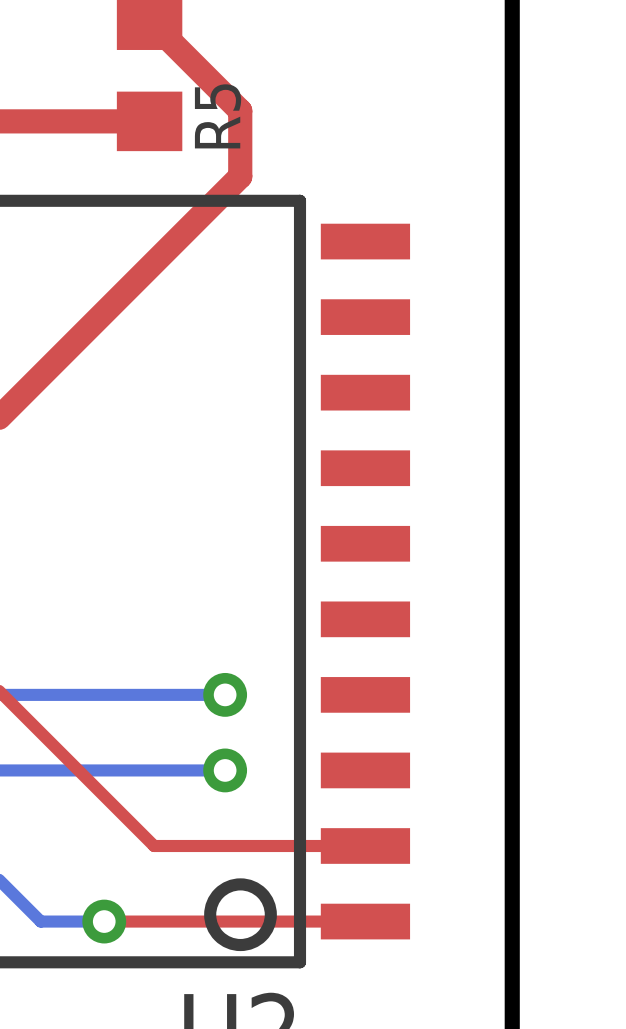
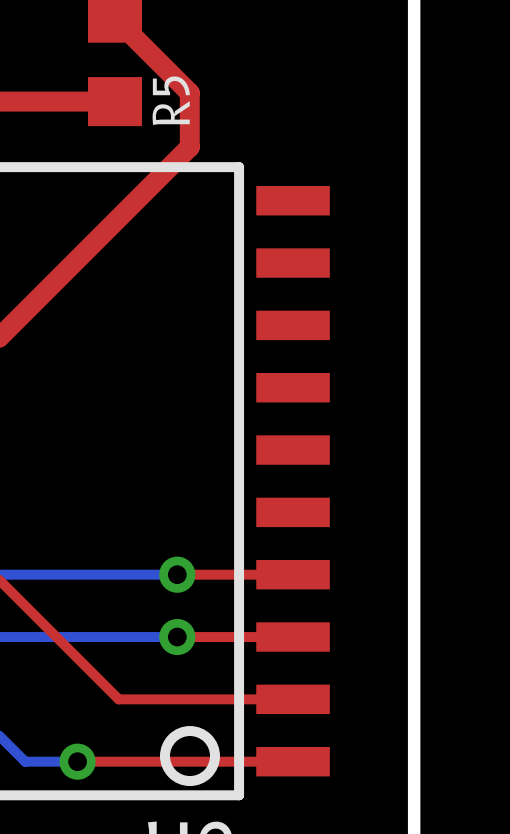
top track: none -> (177, 574) (293, 574)
top track: none -> (177, 637) (293, 637)

